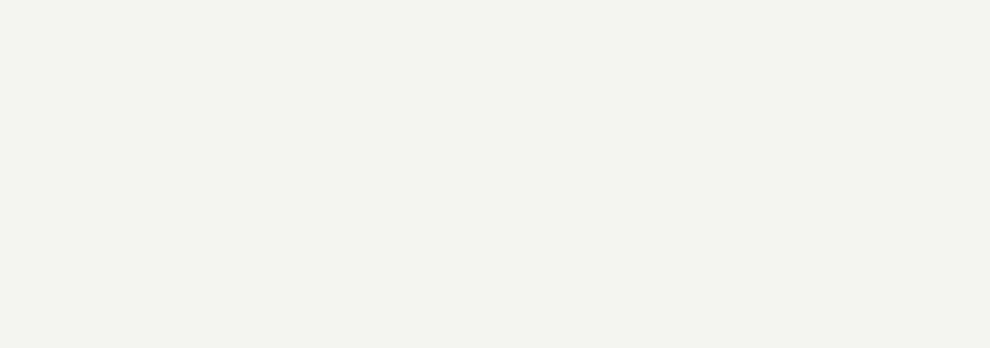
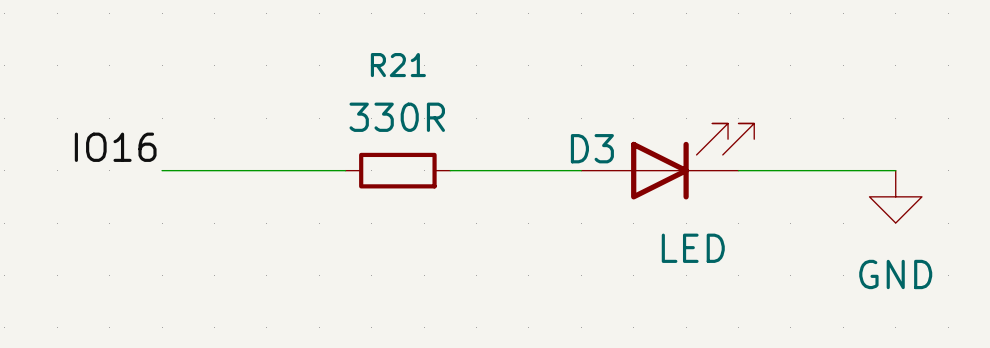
label: none -> IO16 (115, 147)
D3: none -> LED (667, 161)
wire: none -> (162, 170) (345, 170)
R21: none -> 330R (397, 170)
wire: none -> (450, 170) (581, 170)
wire: none -> (738, 170) (895, 170)
power symbol: none -> GND (895, 196)

